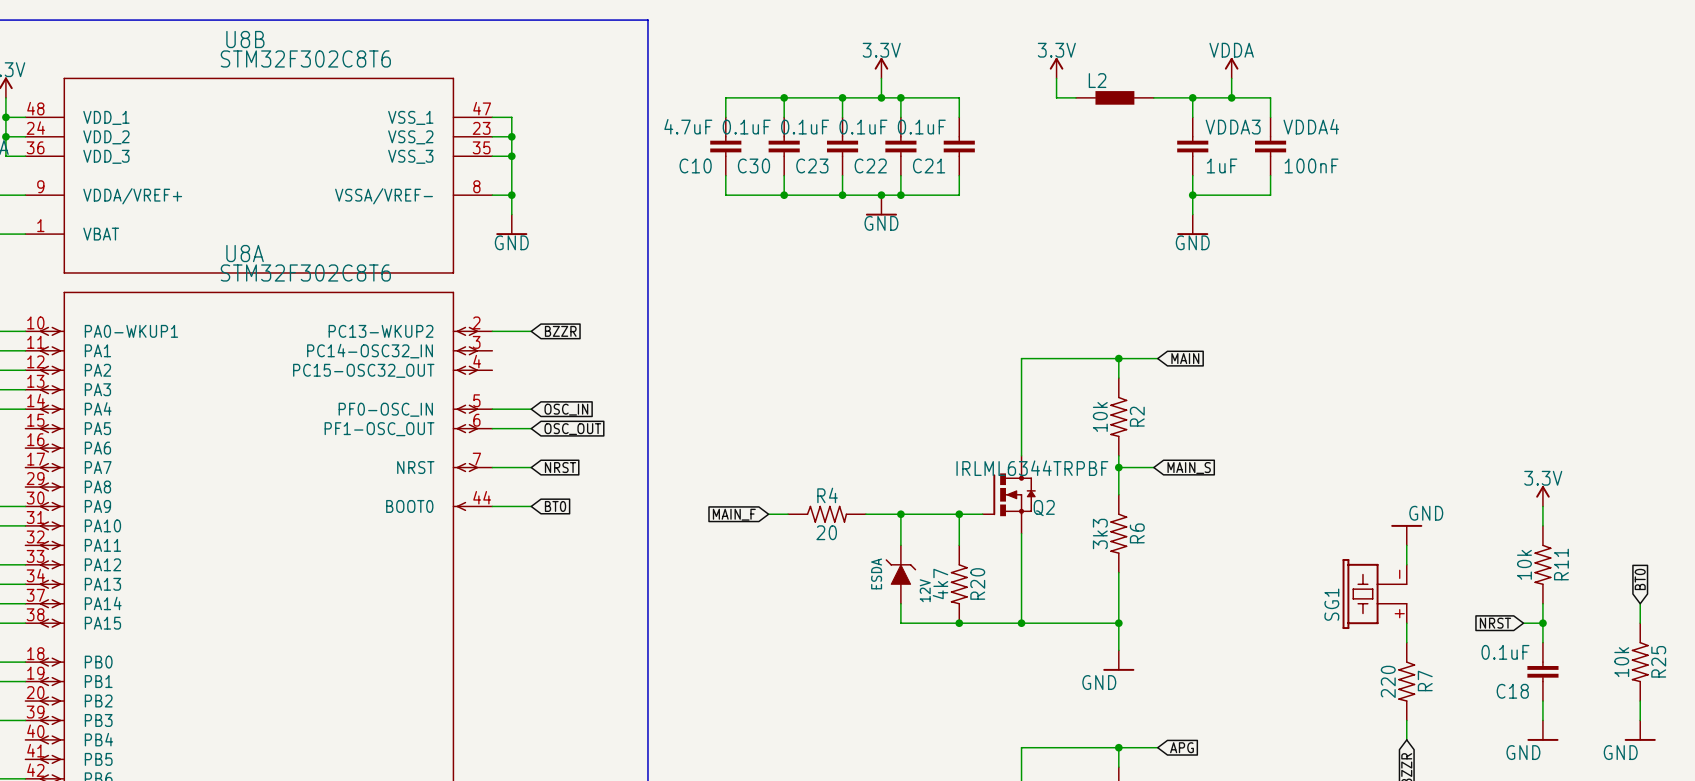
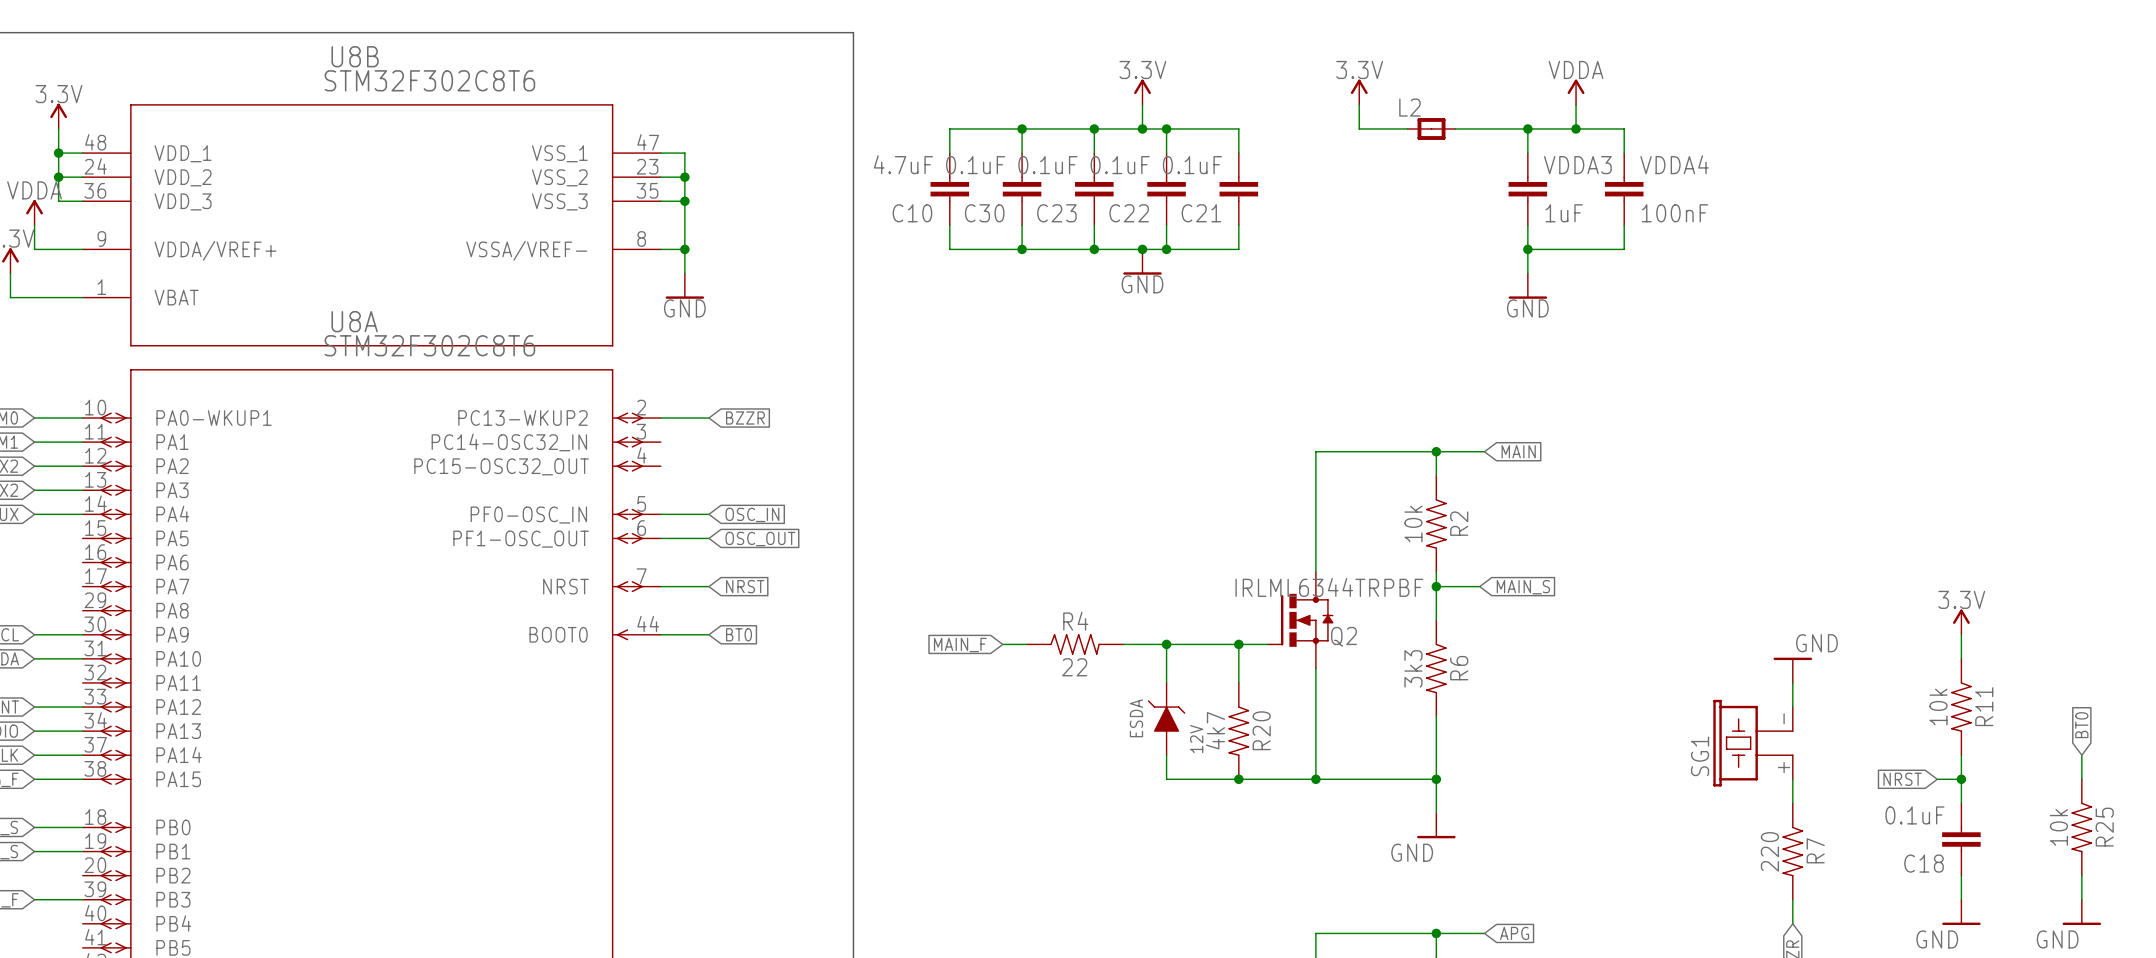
L2 symbol: [1076, 91, 1154, 105] -> [1407, 118, 1456, 140]
R4 value: 20 (826, 532) -> 22 (1074, 667)

